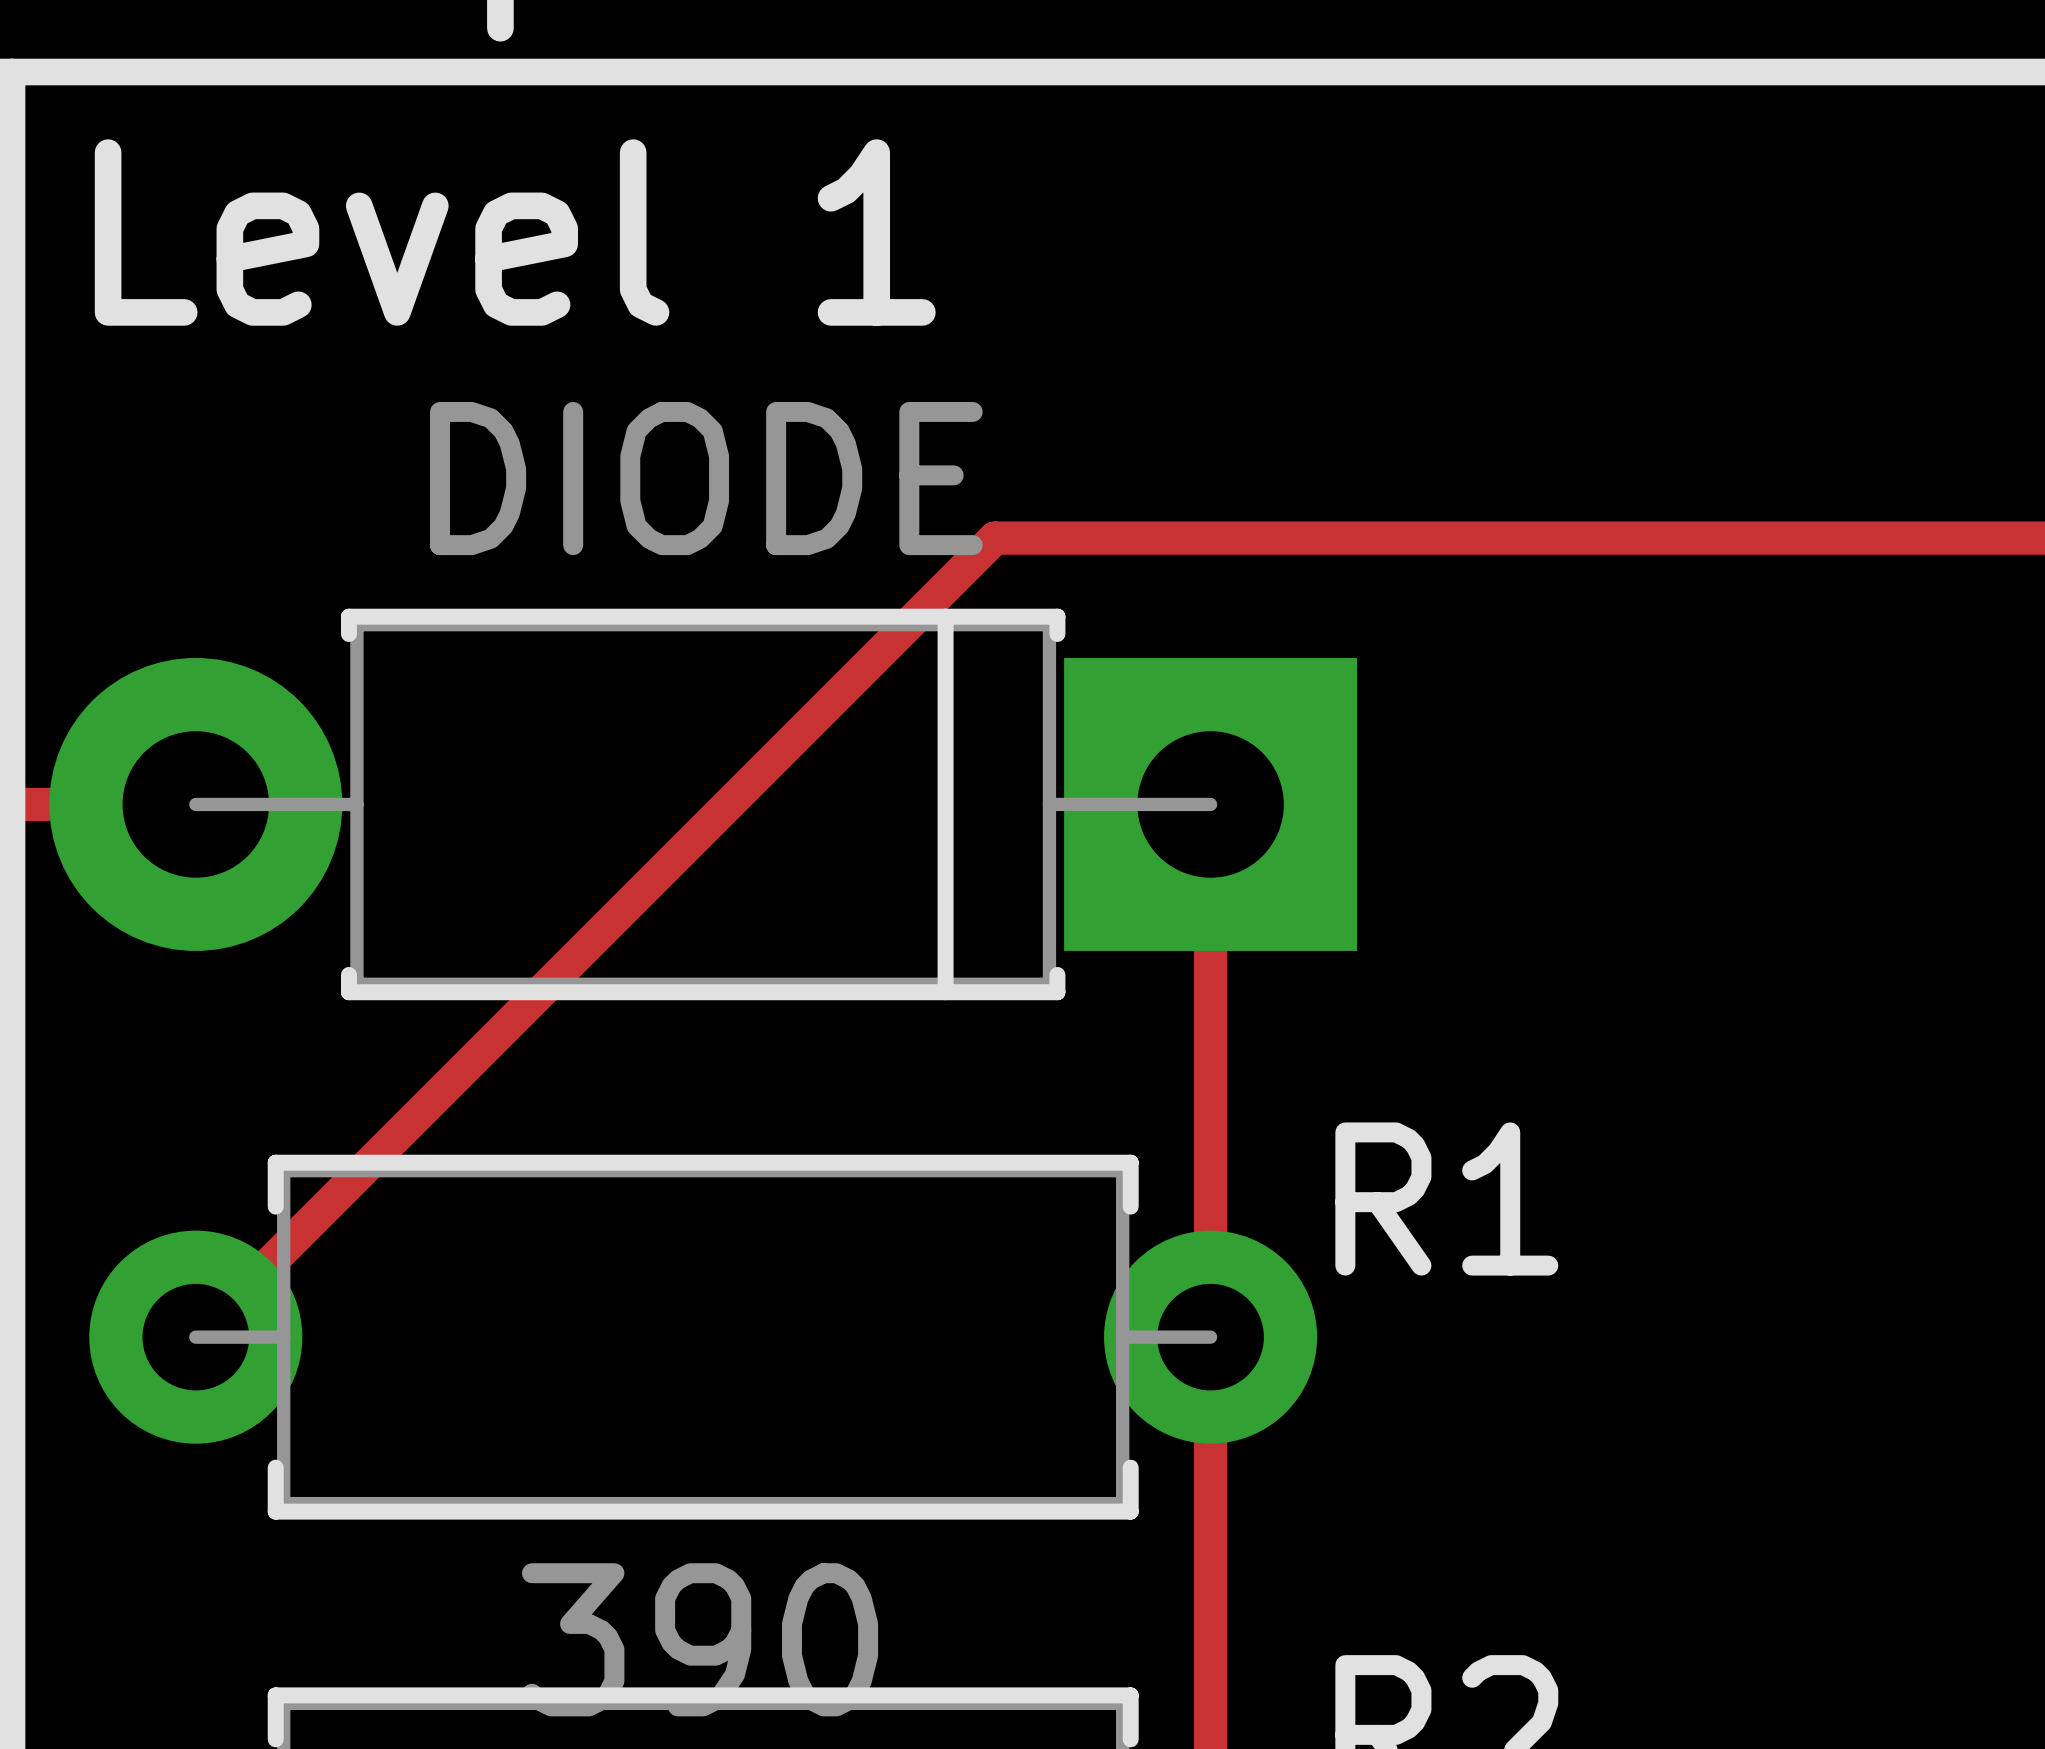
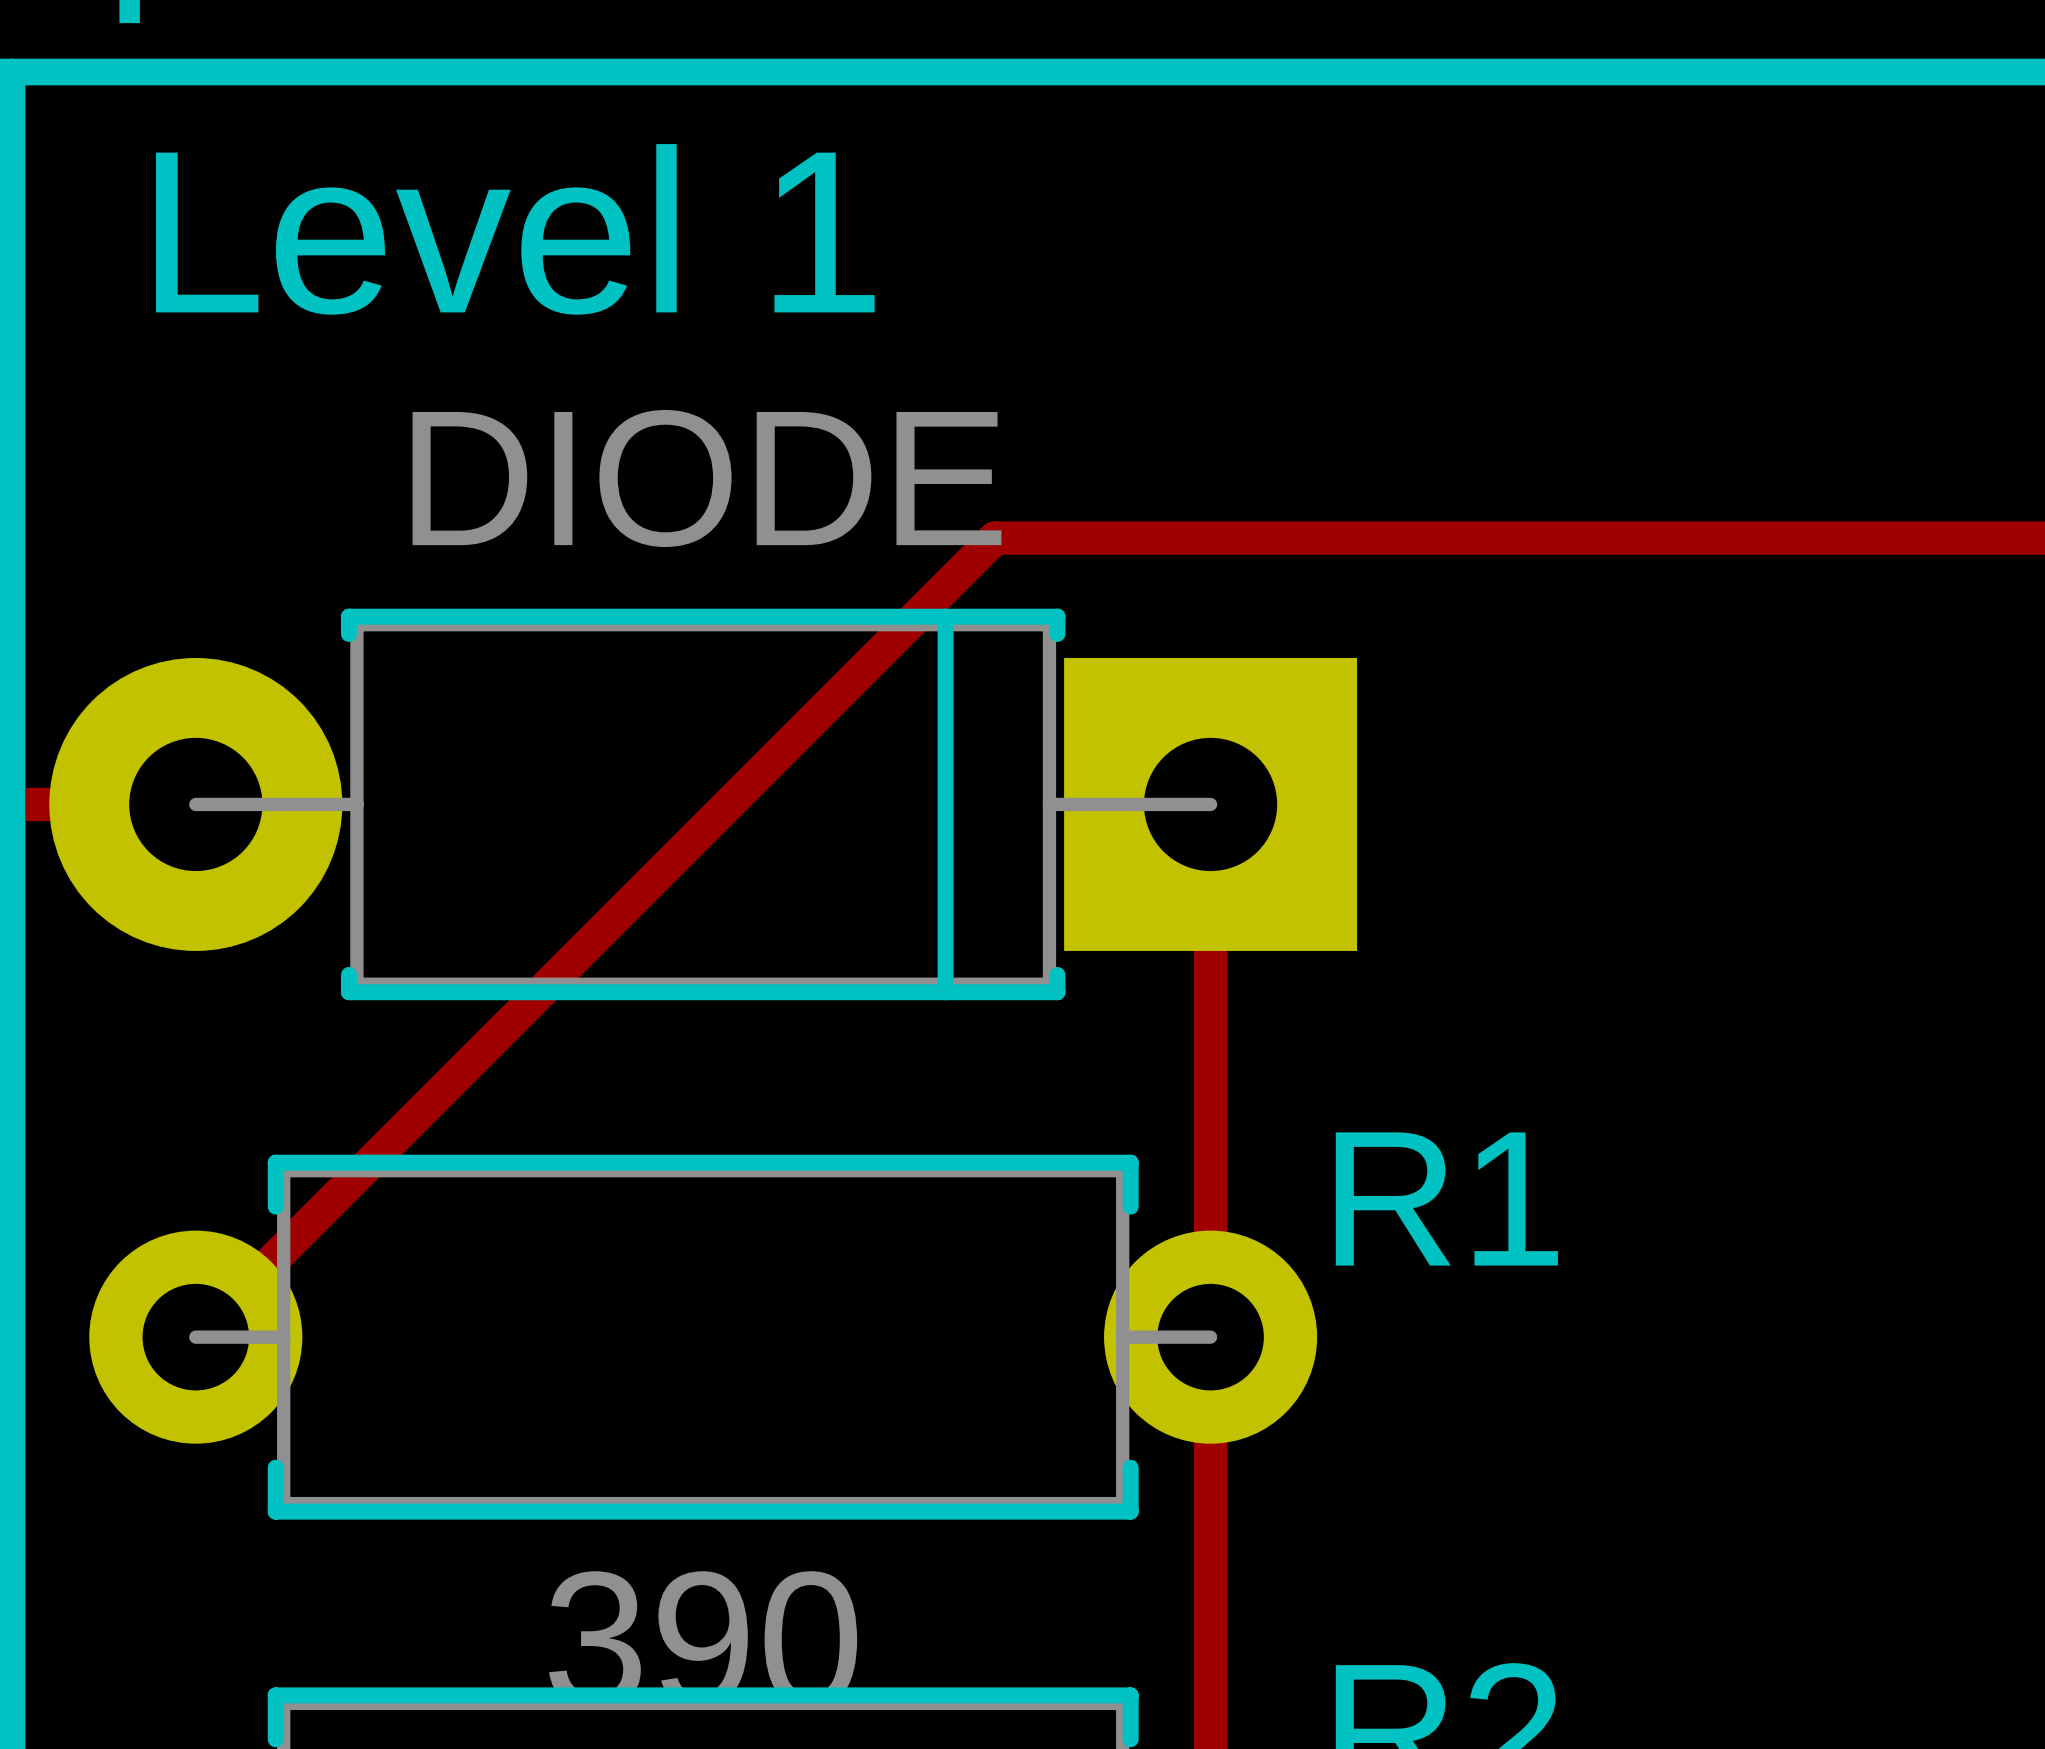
part footprint: [49, 608, 1358, 1001] -> [49, 608, 1358, 1001]

